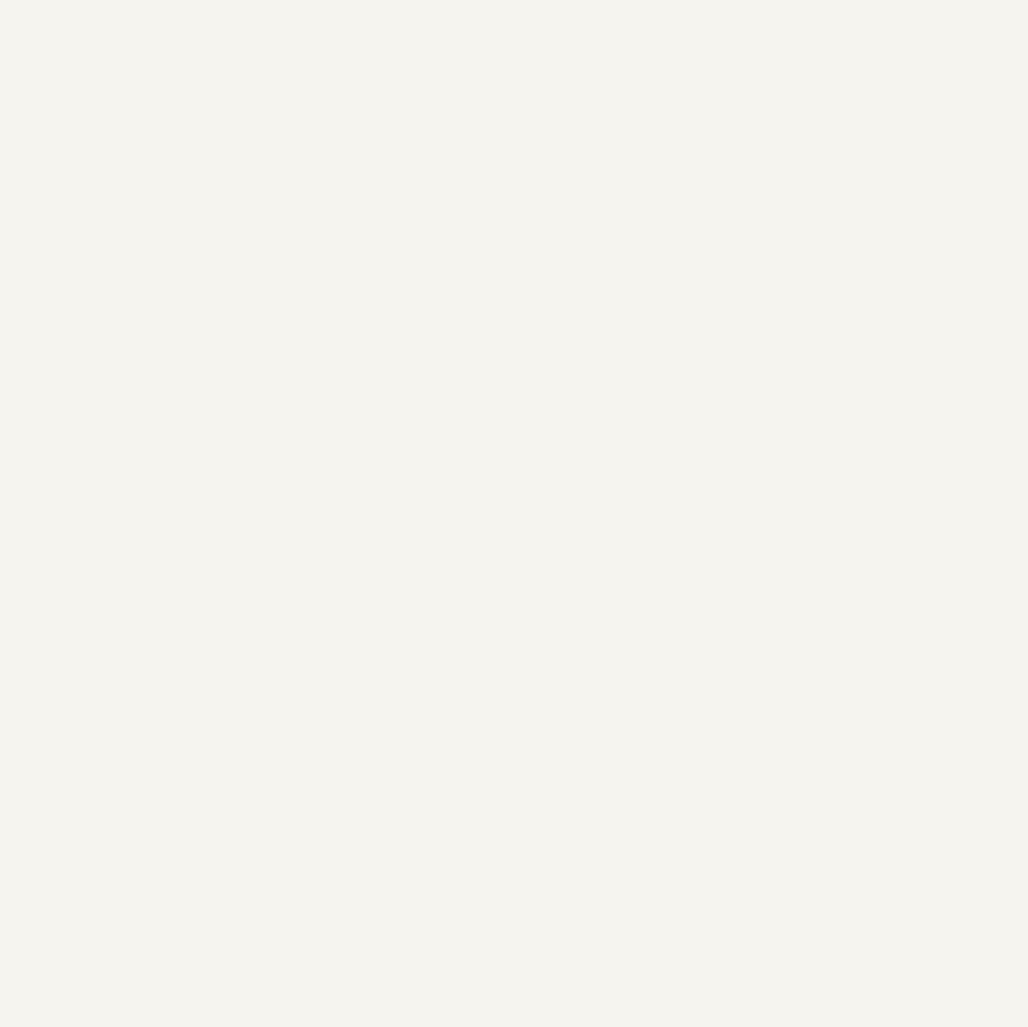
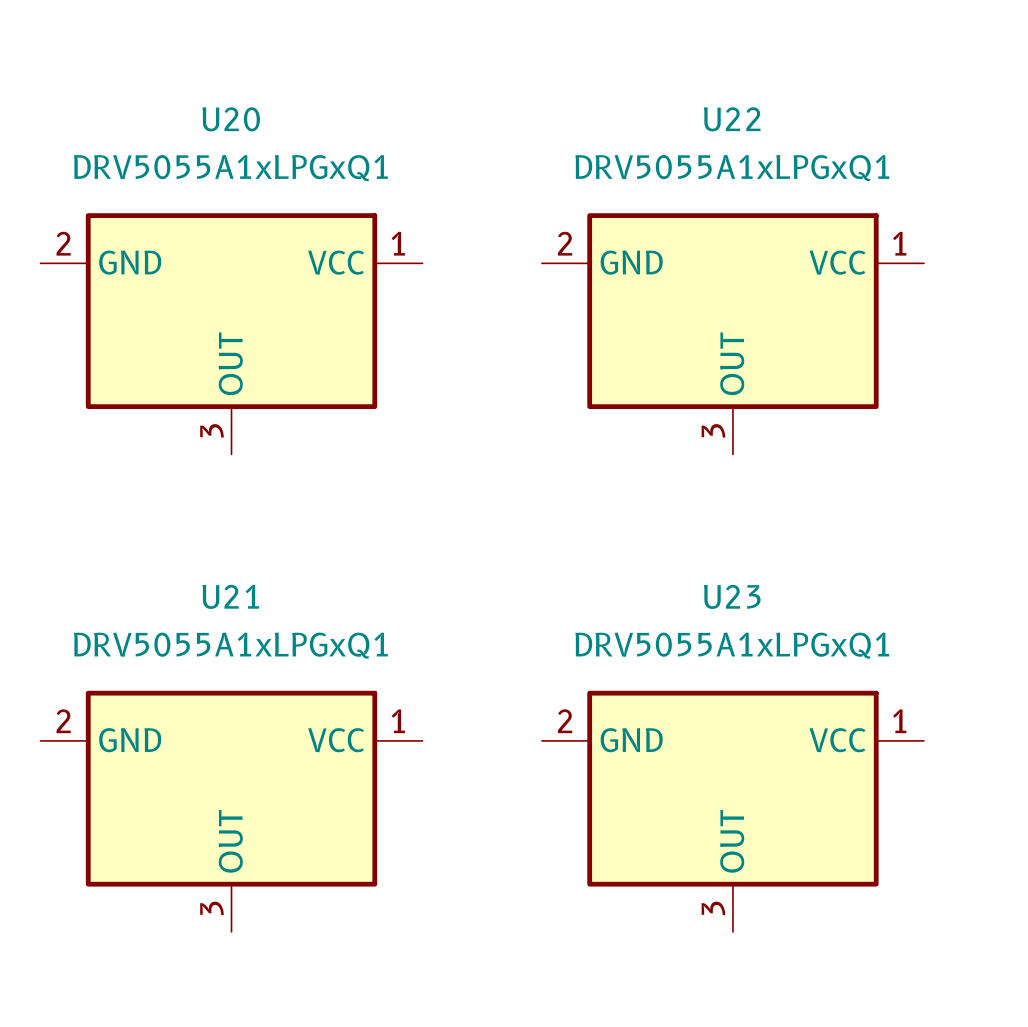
U20: none -> DRV5055A1xLPGxQ1 (231, 333)
U22: none -> DRV5055A1xLPGxQ1 (732, 333)
U21: none -> DRV5055A1xLPGxQ1 (231, 811)
U23: none -> DRV5055A1xLPGxQ1 (732, 811)

